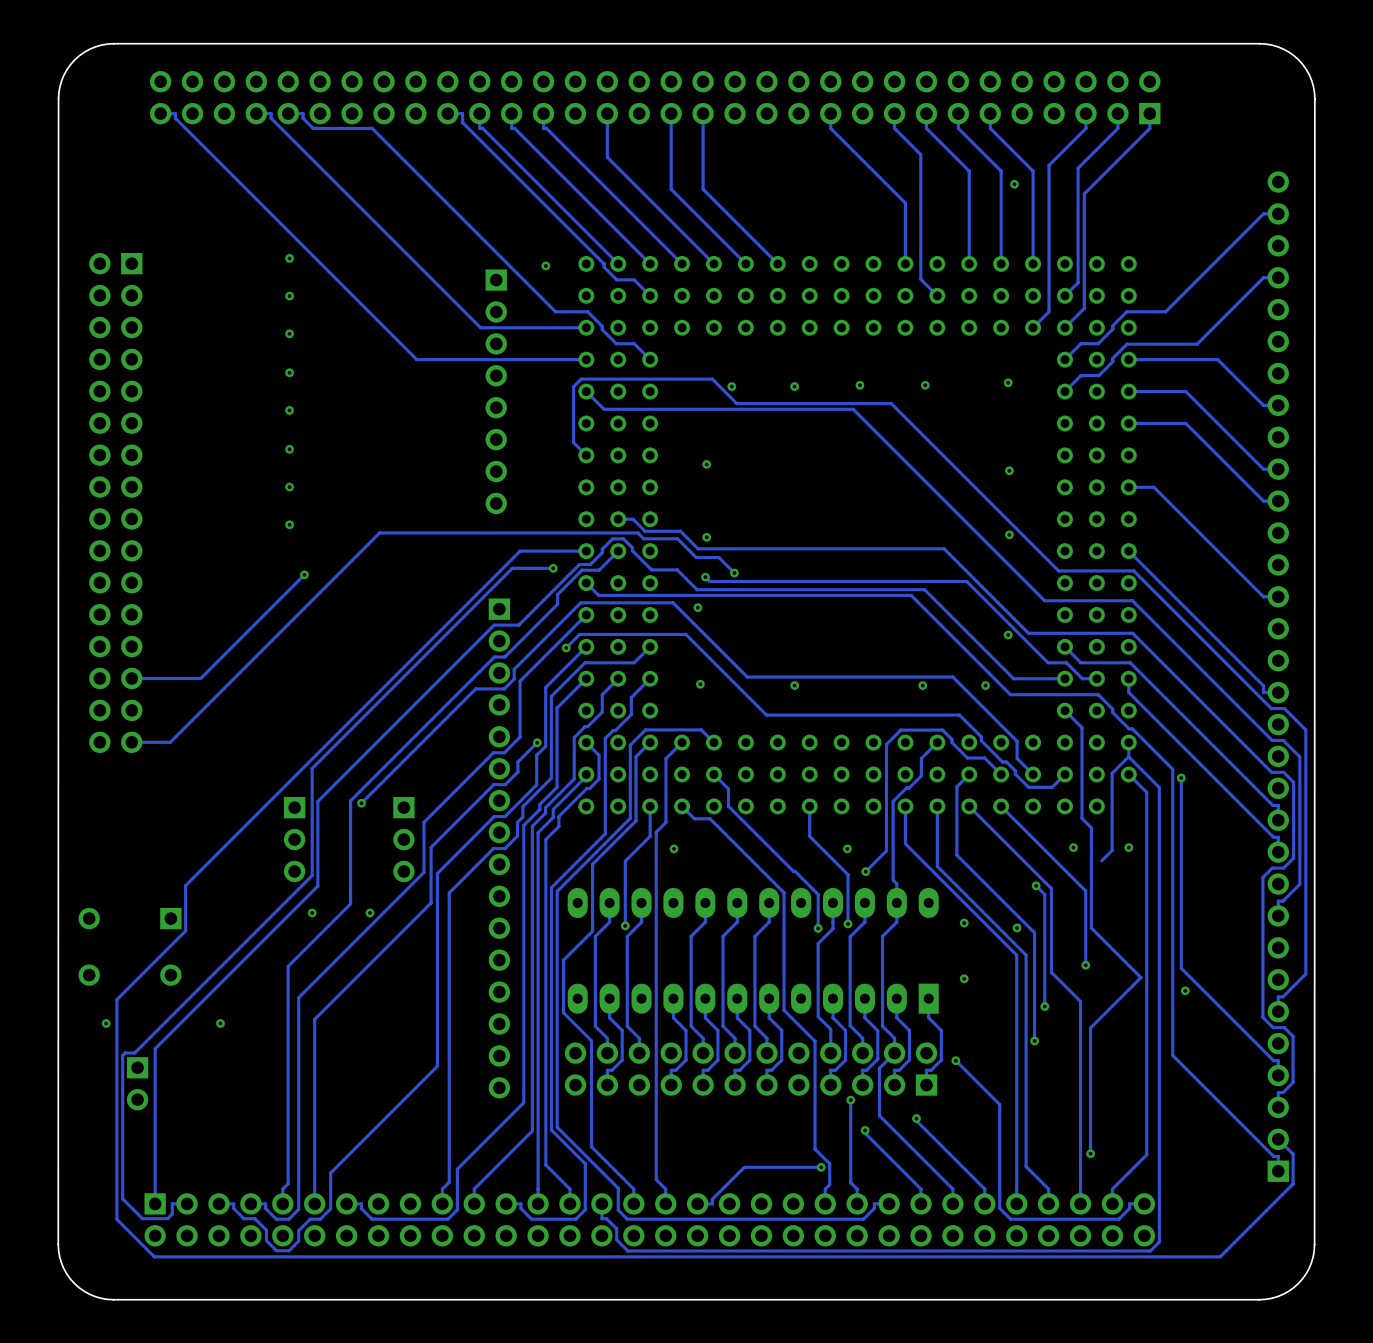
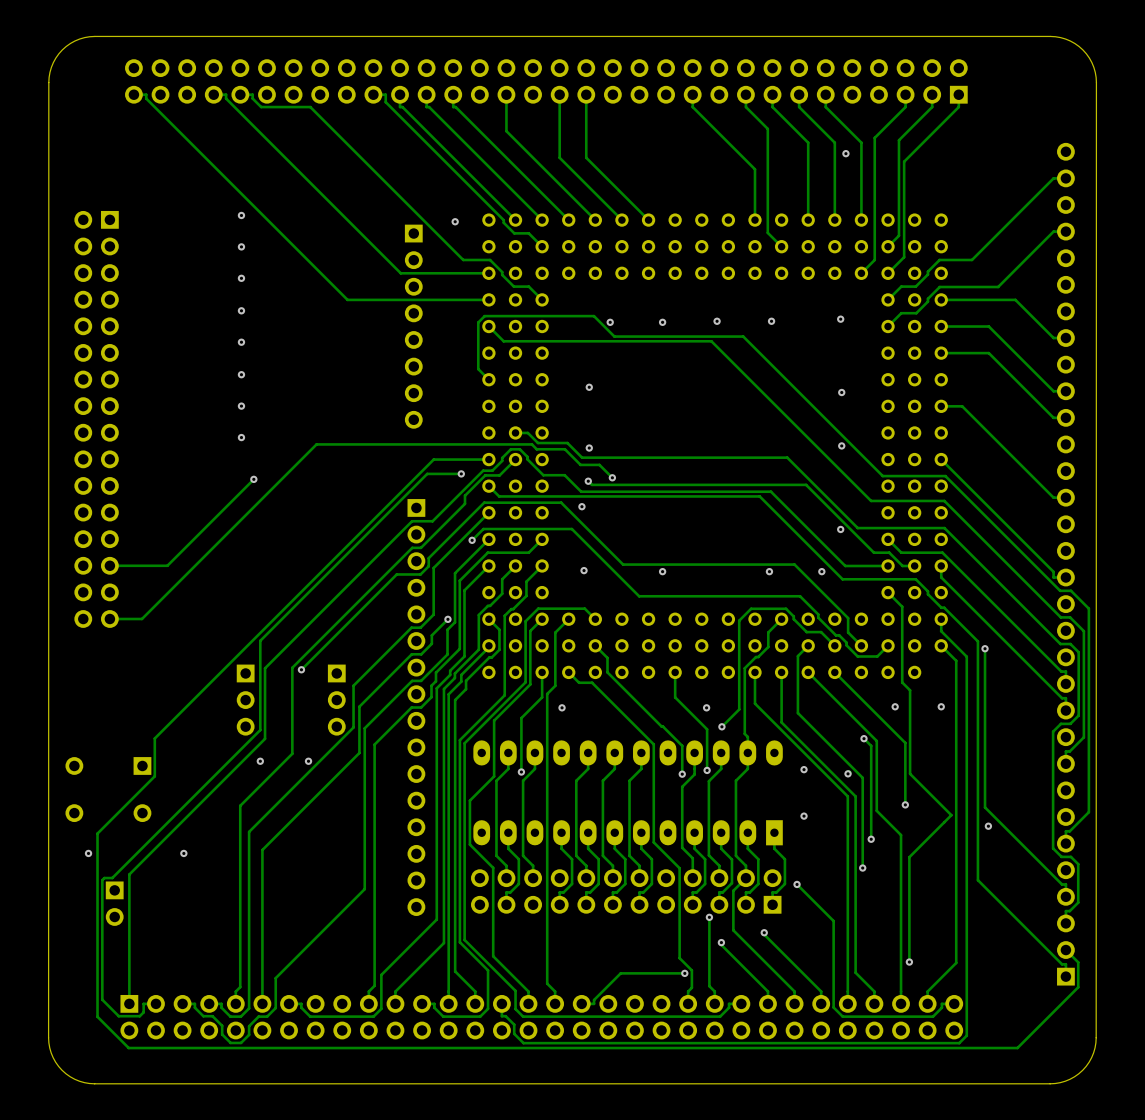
track: (1128, 756) (1112, 773) (1112, 850) (1101, 860) -> none

